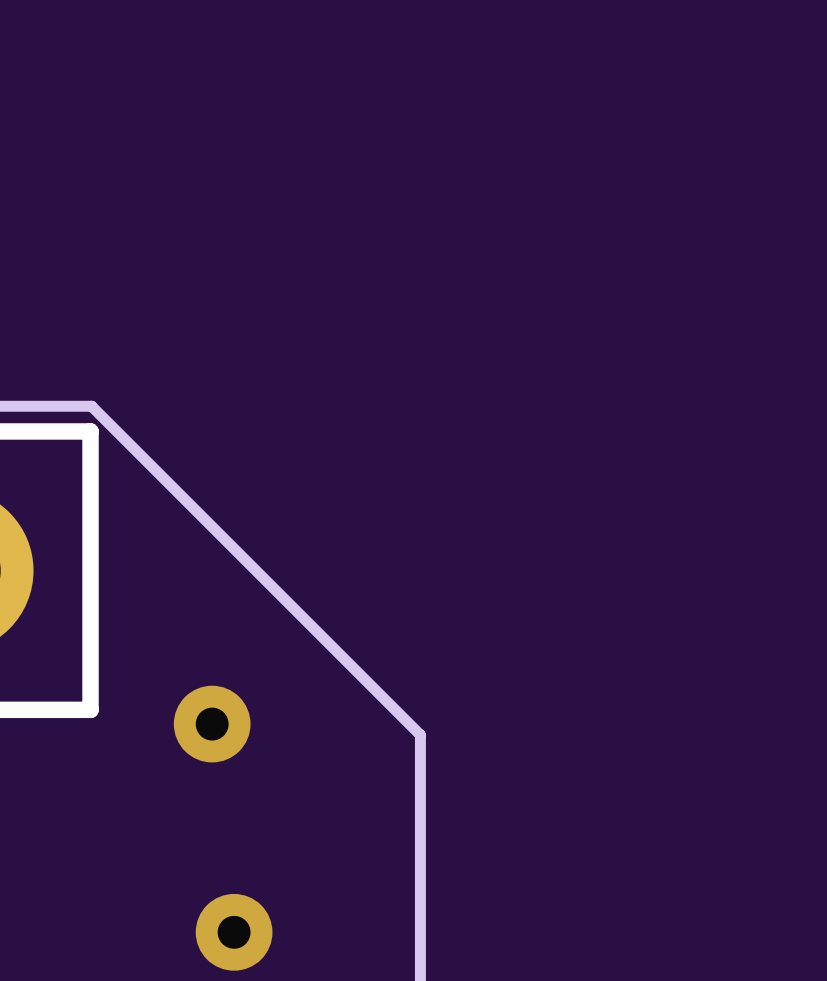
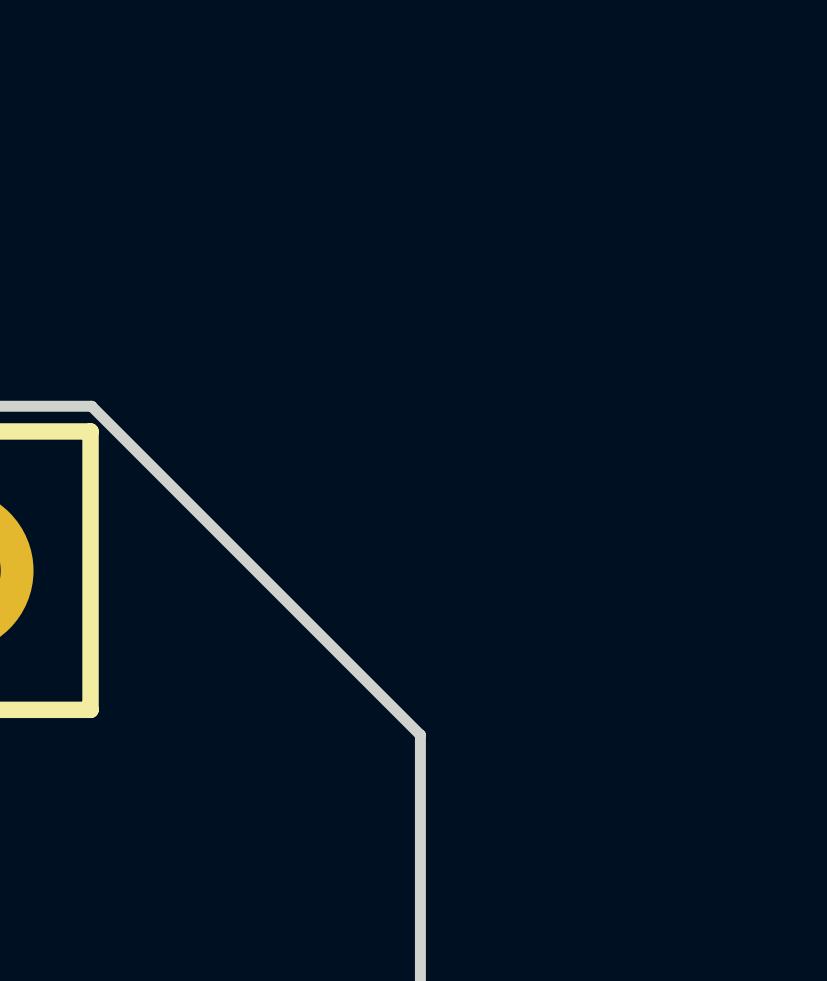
via: (212, 724) -> none
via: (234, 932) -> none

